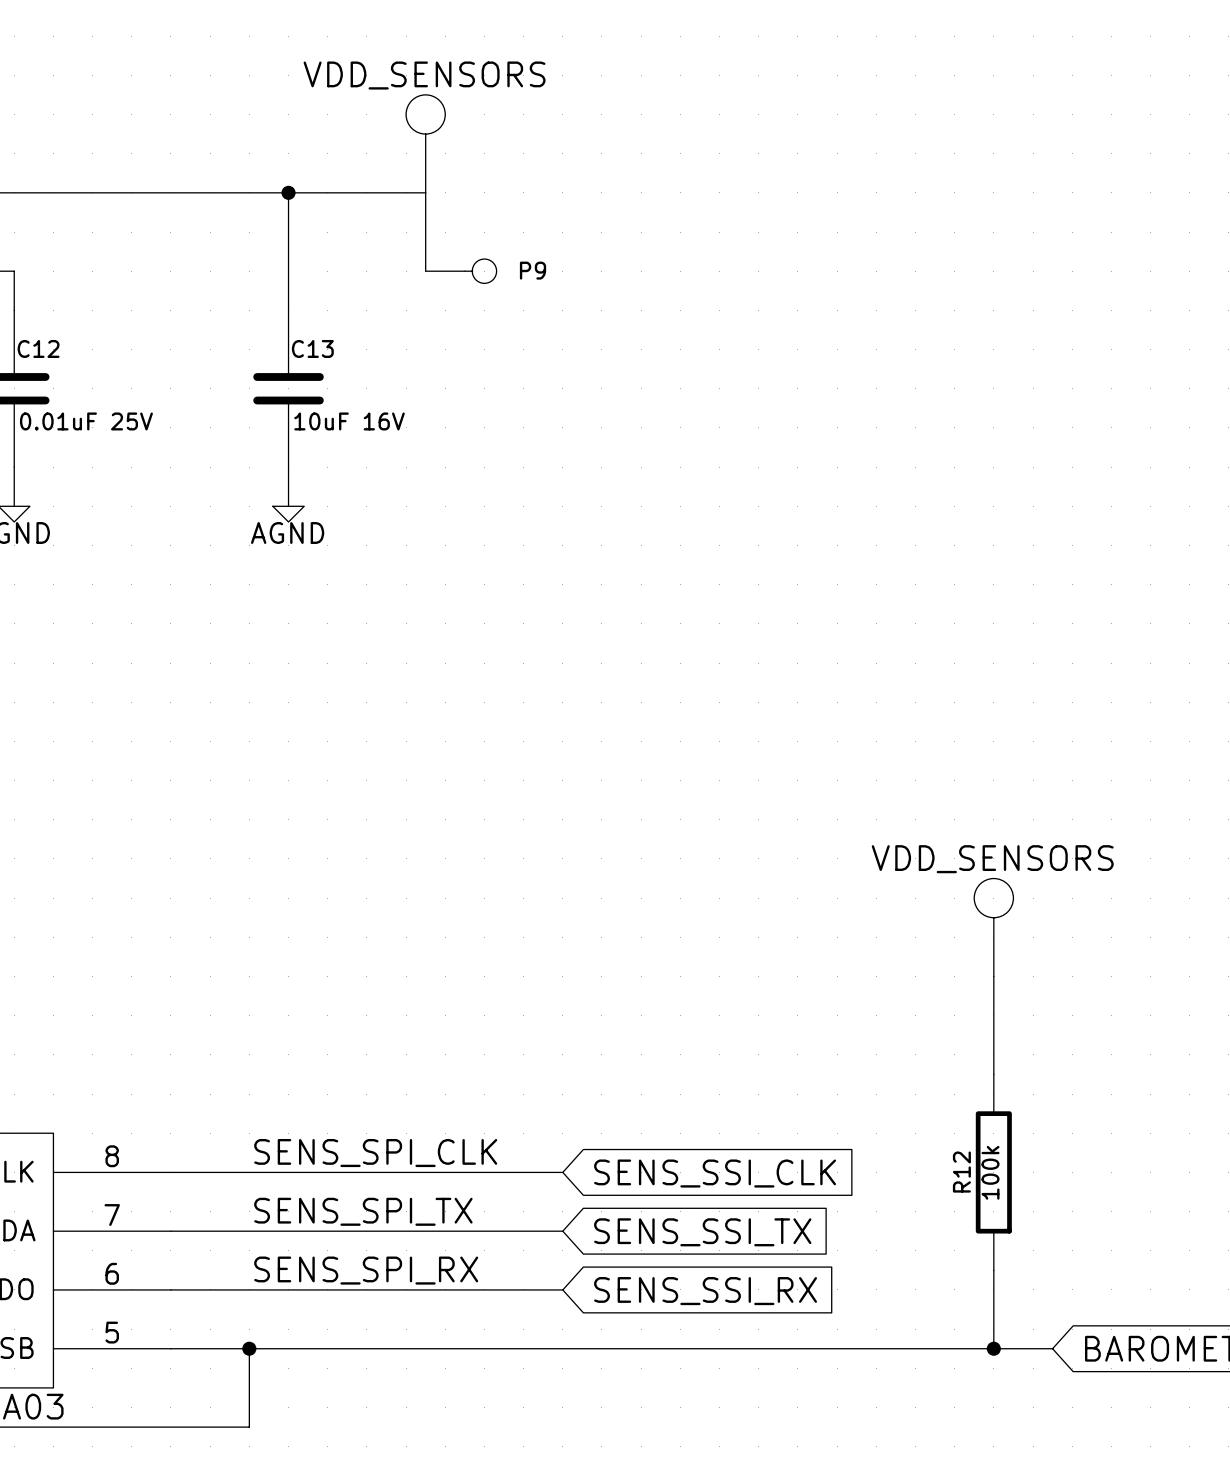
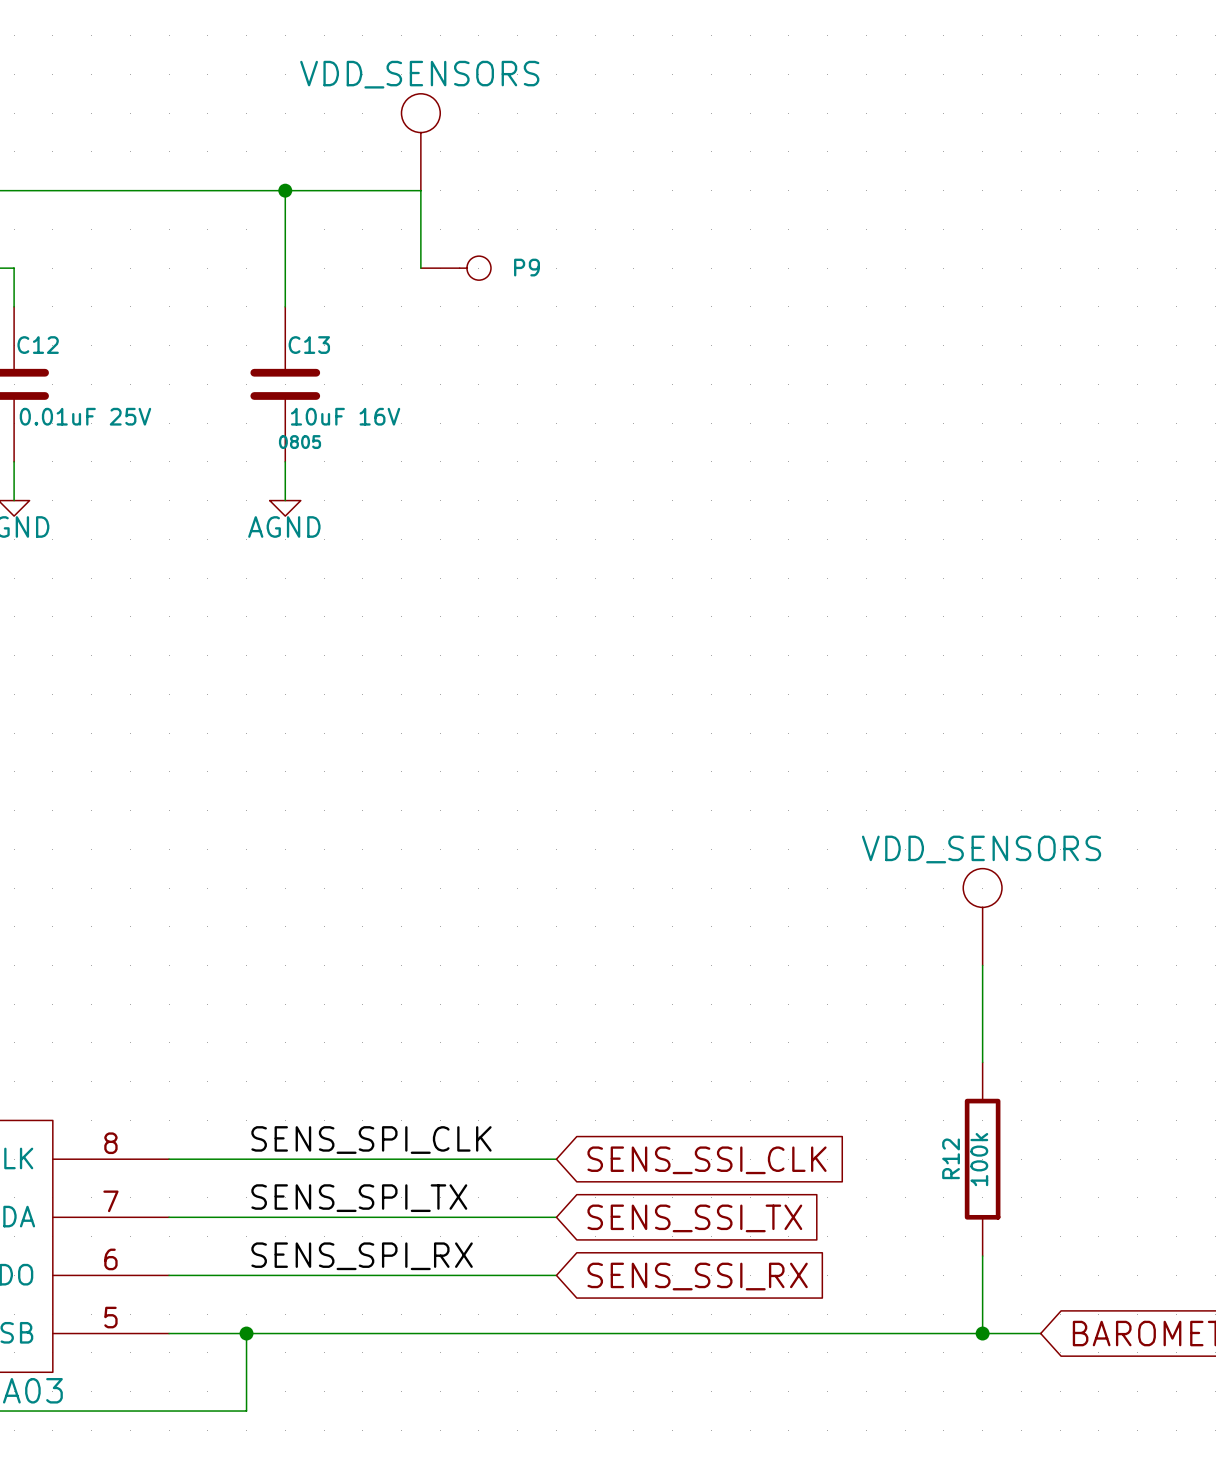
C13 text: none -> 0805 (300, 442)

